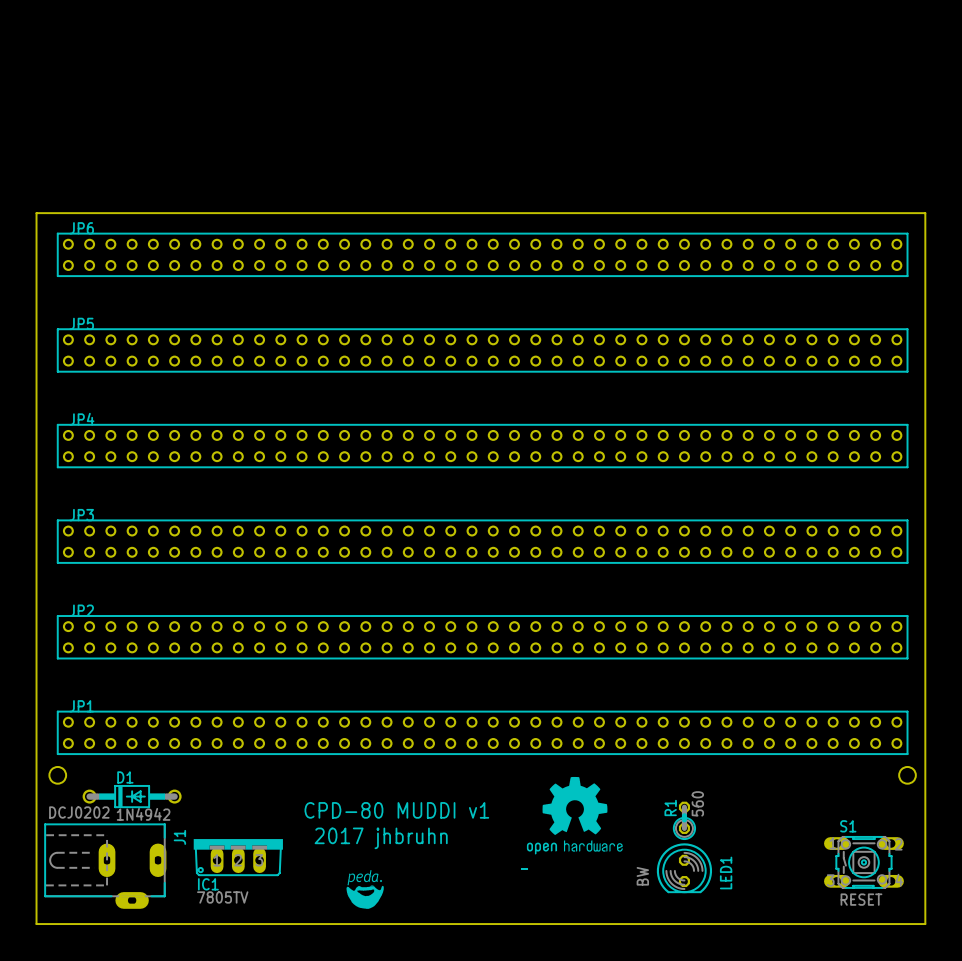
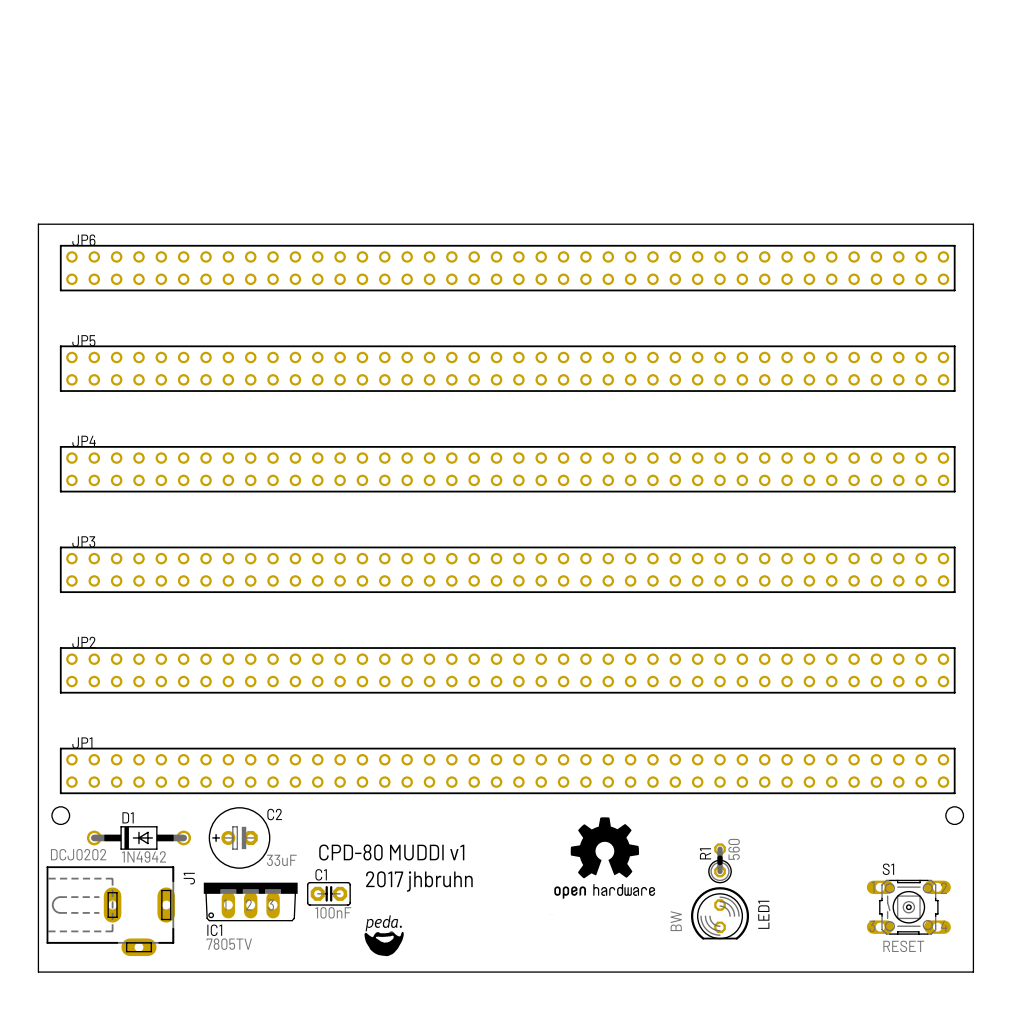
C2: none -> 33uF (239, 837)
C1: none -> 100nF (328, 893)

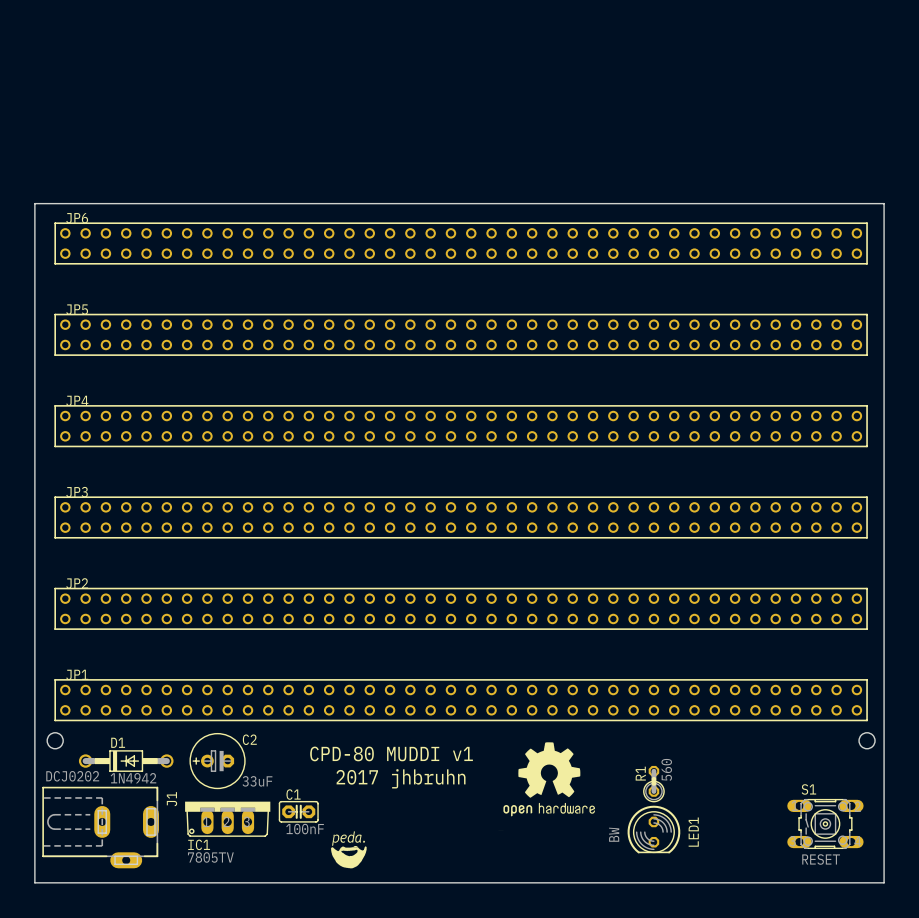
text position: CPD-80 MUDDI v1 (391, 852) -> CPD-80 MUDDI v1 (391, 753)
text position: 2017 jhbruhn (419, 881) -> 2017 jhbruhn (401, 778)

